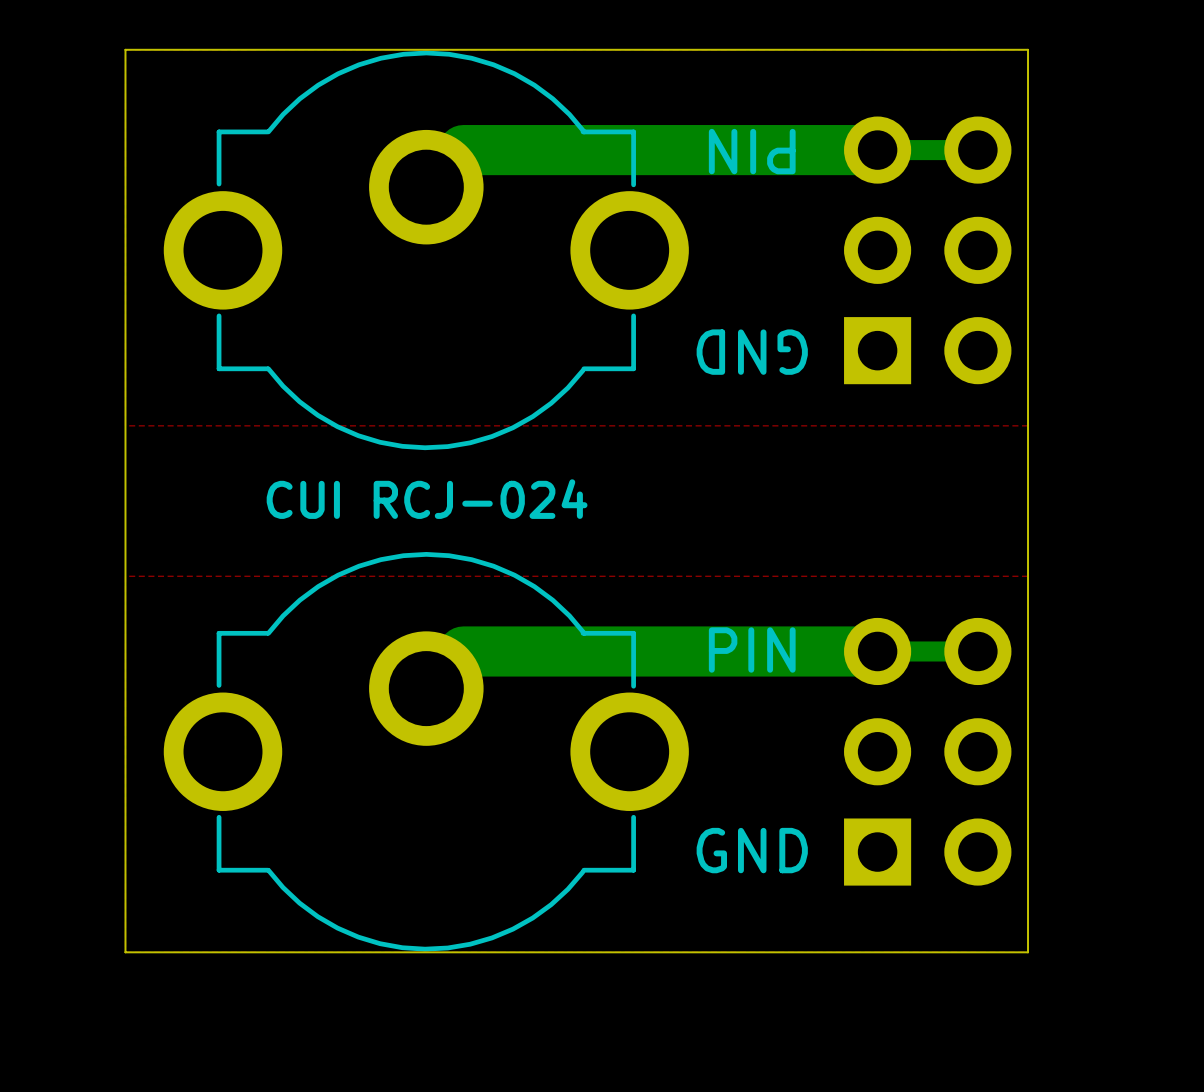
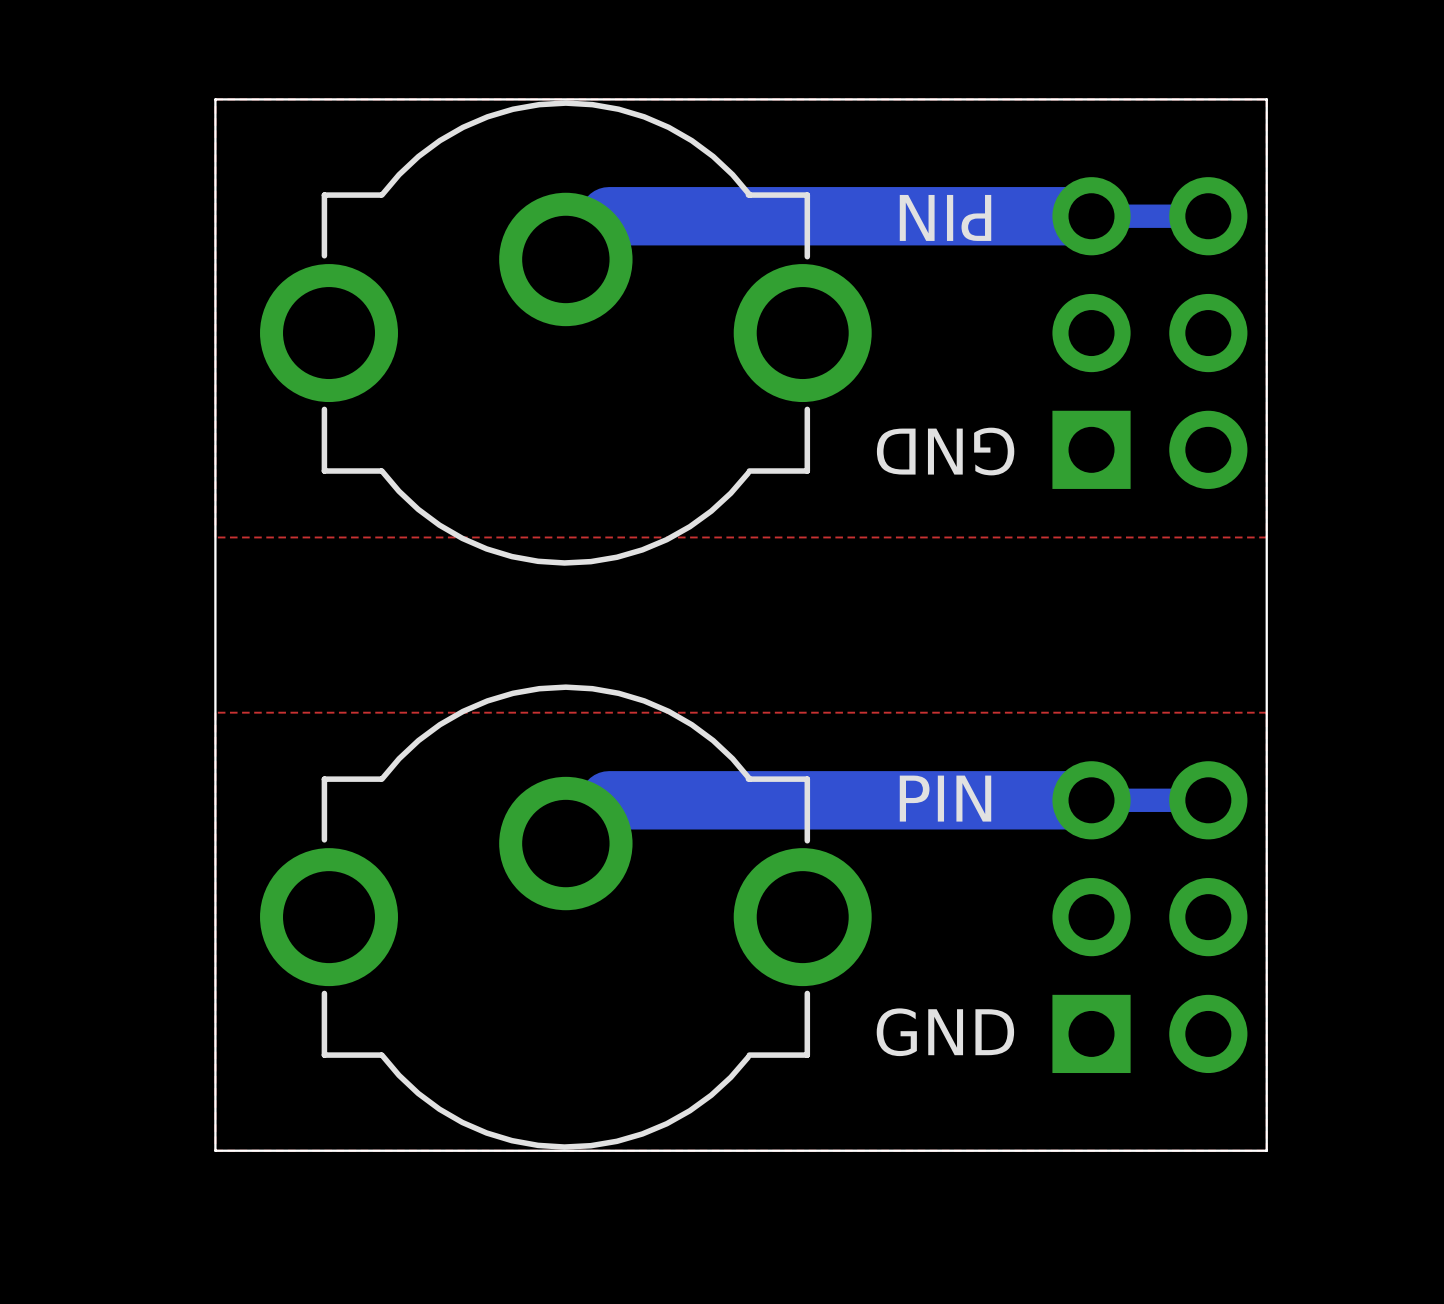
text: CUI RCJ-024 (427, 499) -> none

